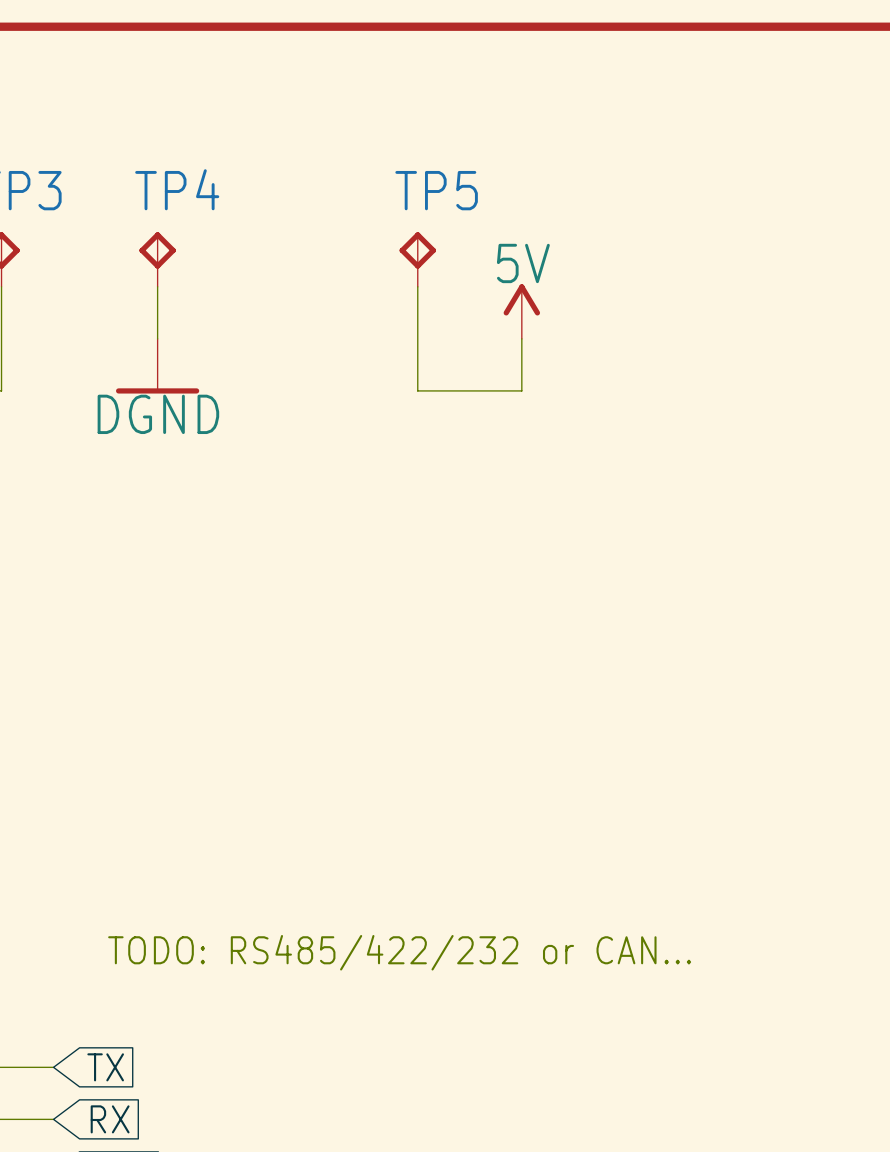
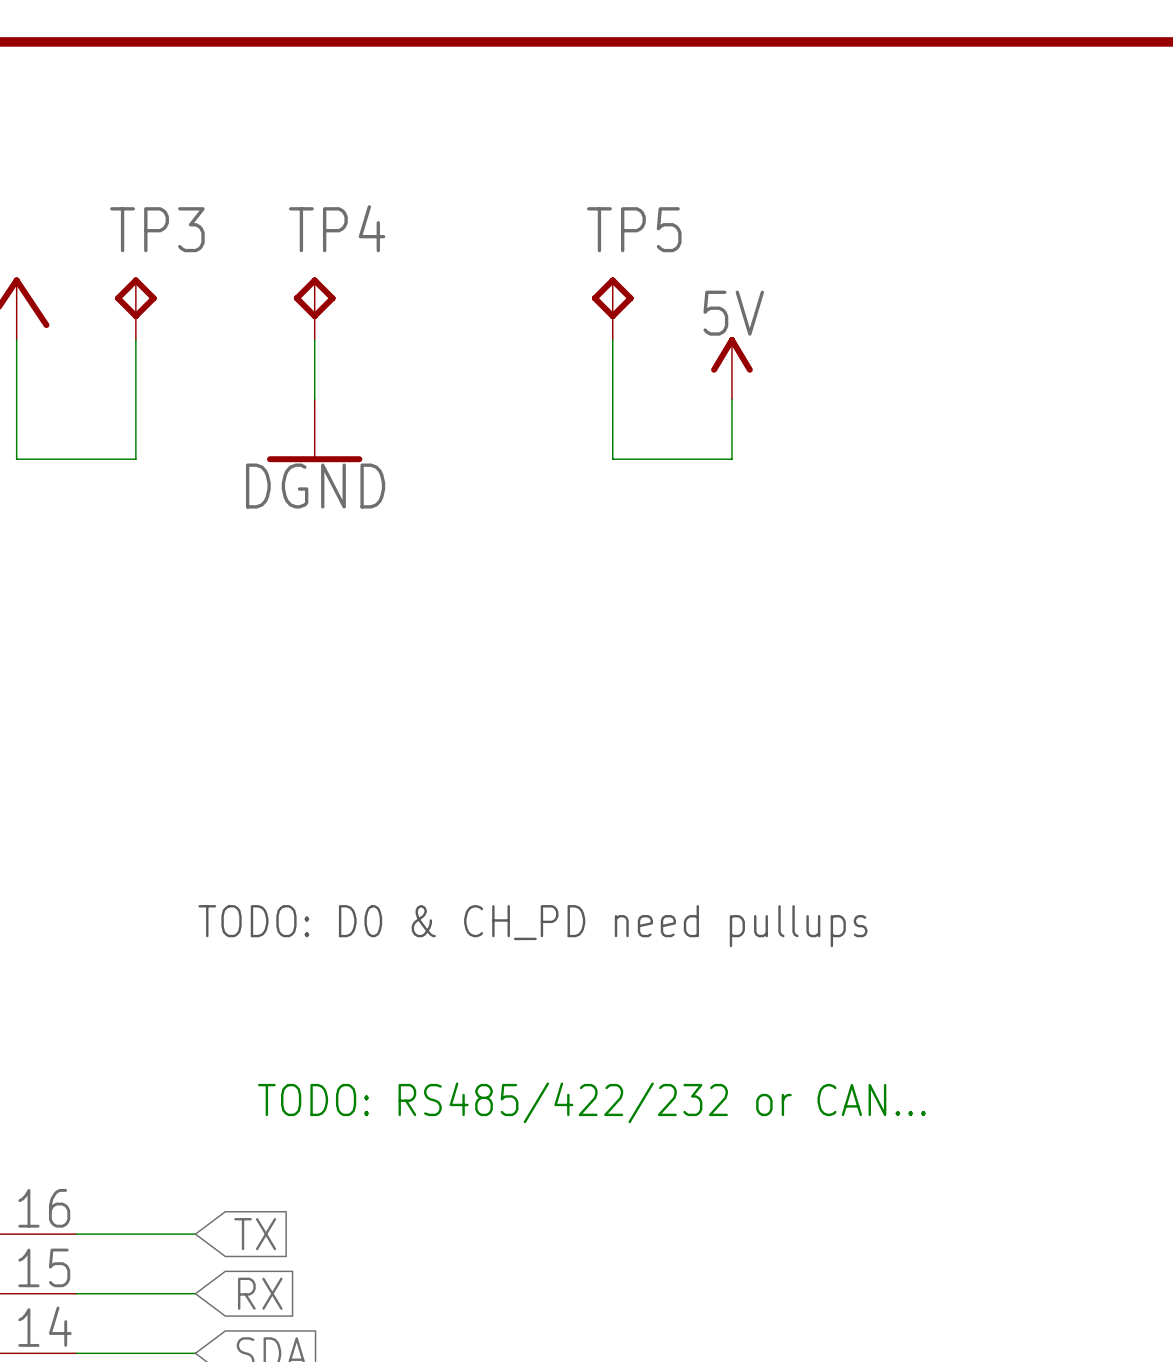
text: none -> TODO: D0 & CH_PD need pullups (532, 926)

